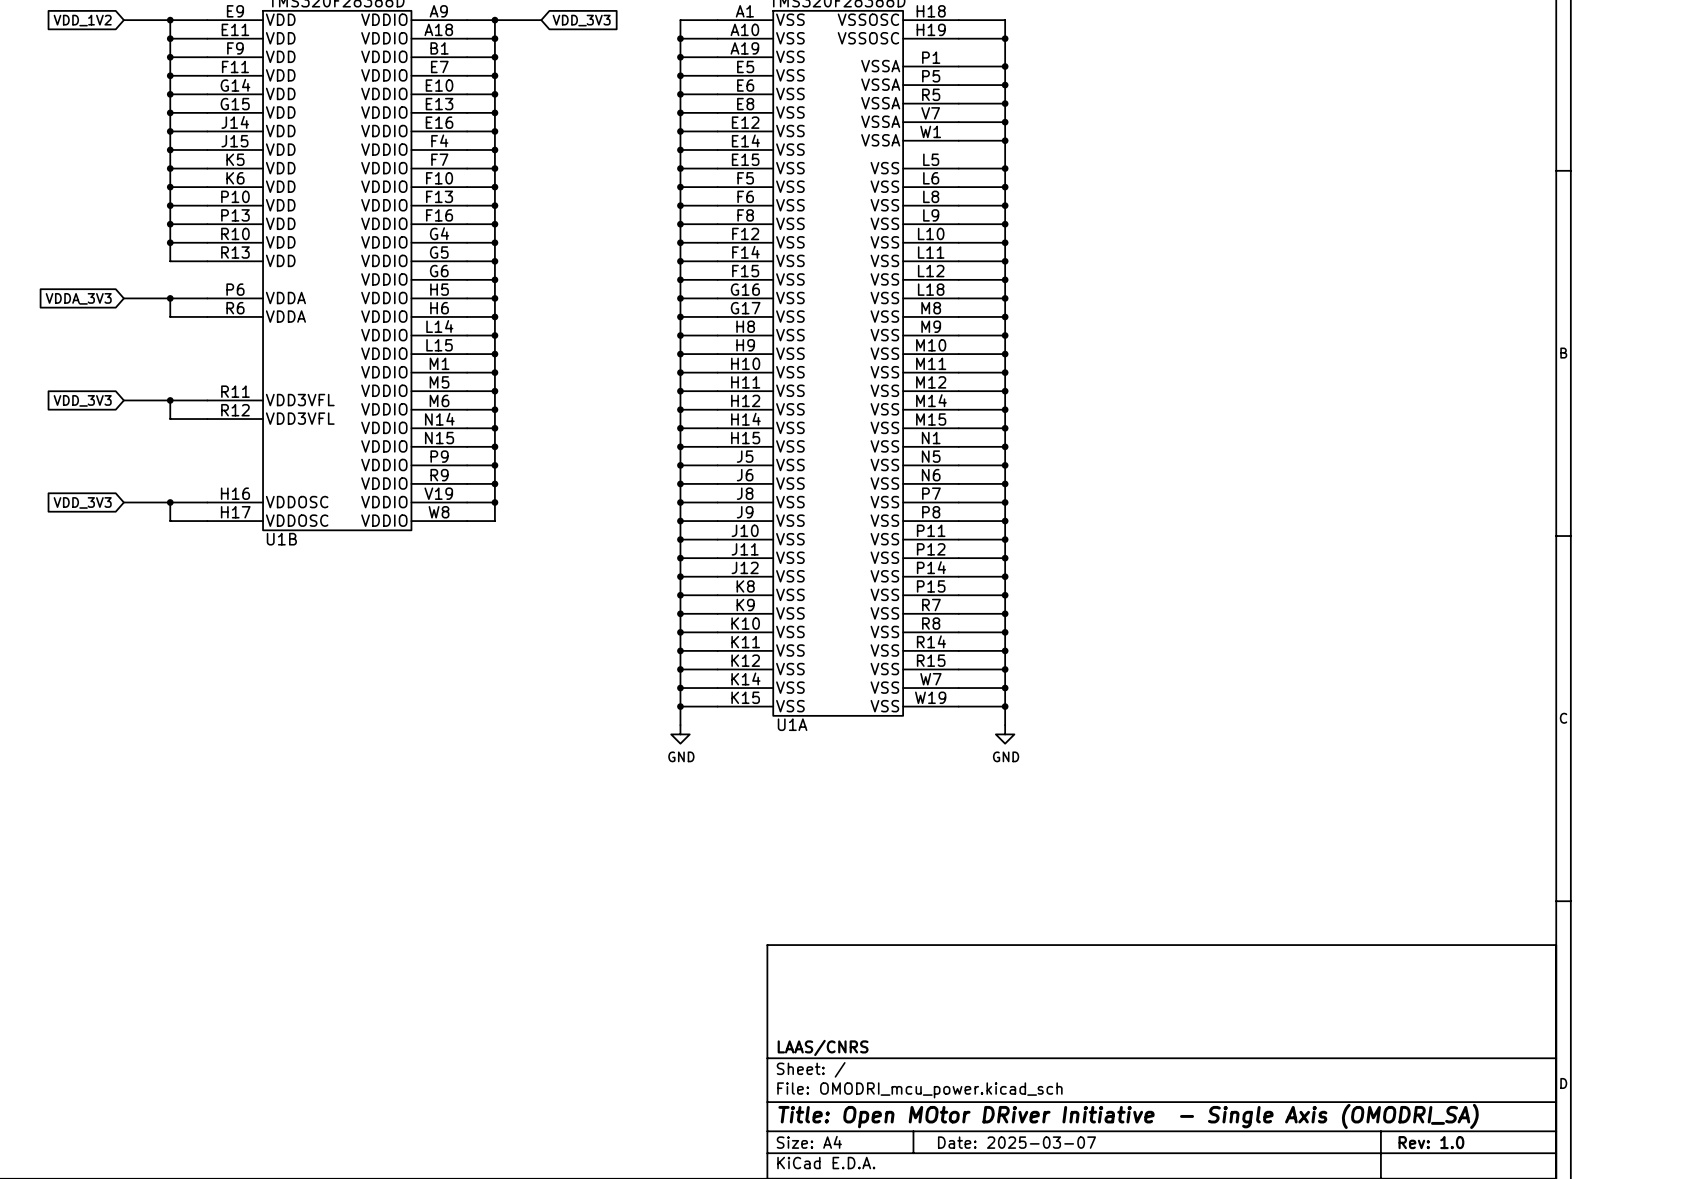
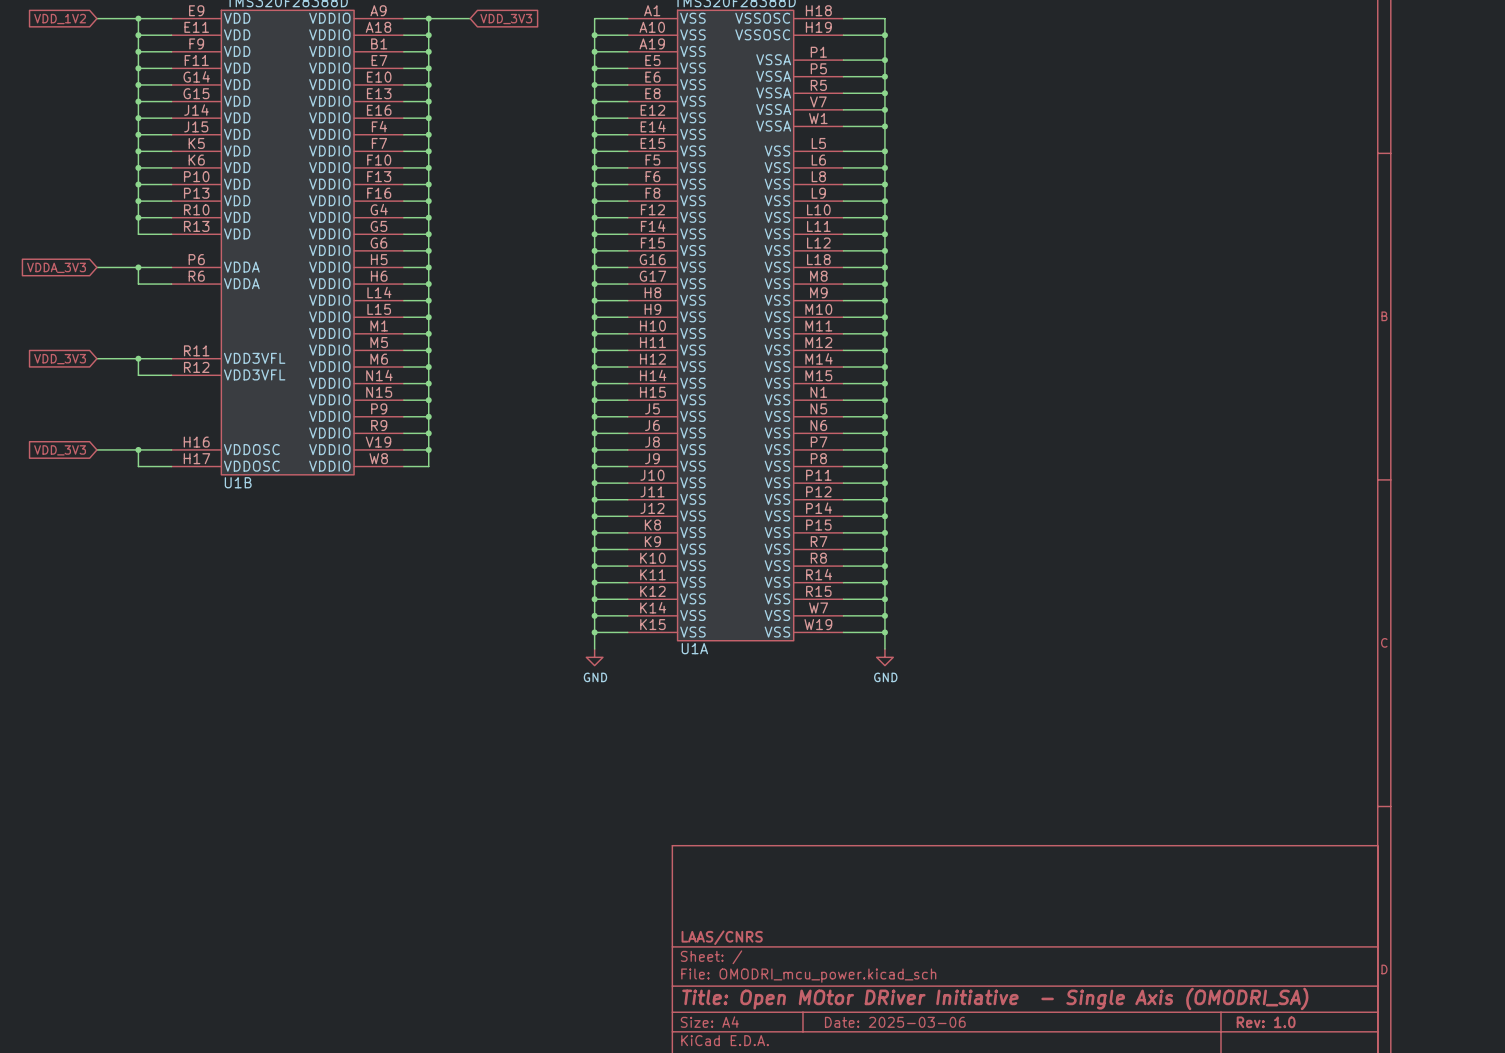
title block: Date: 2025-03-07 (1016, 1142) -> Date: 2025-03-06 (895, 1022)

